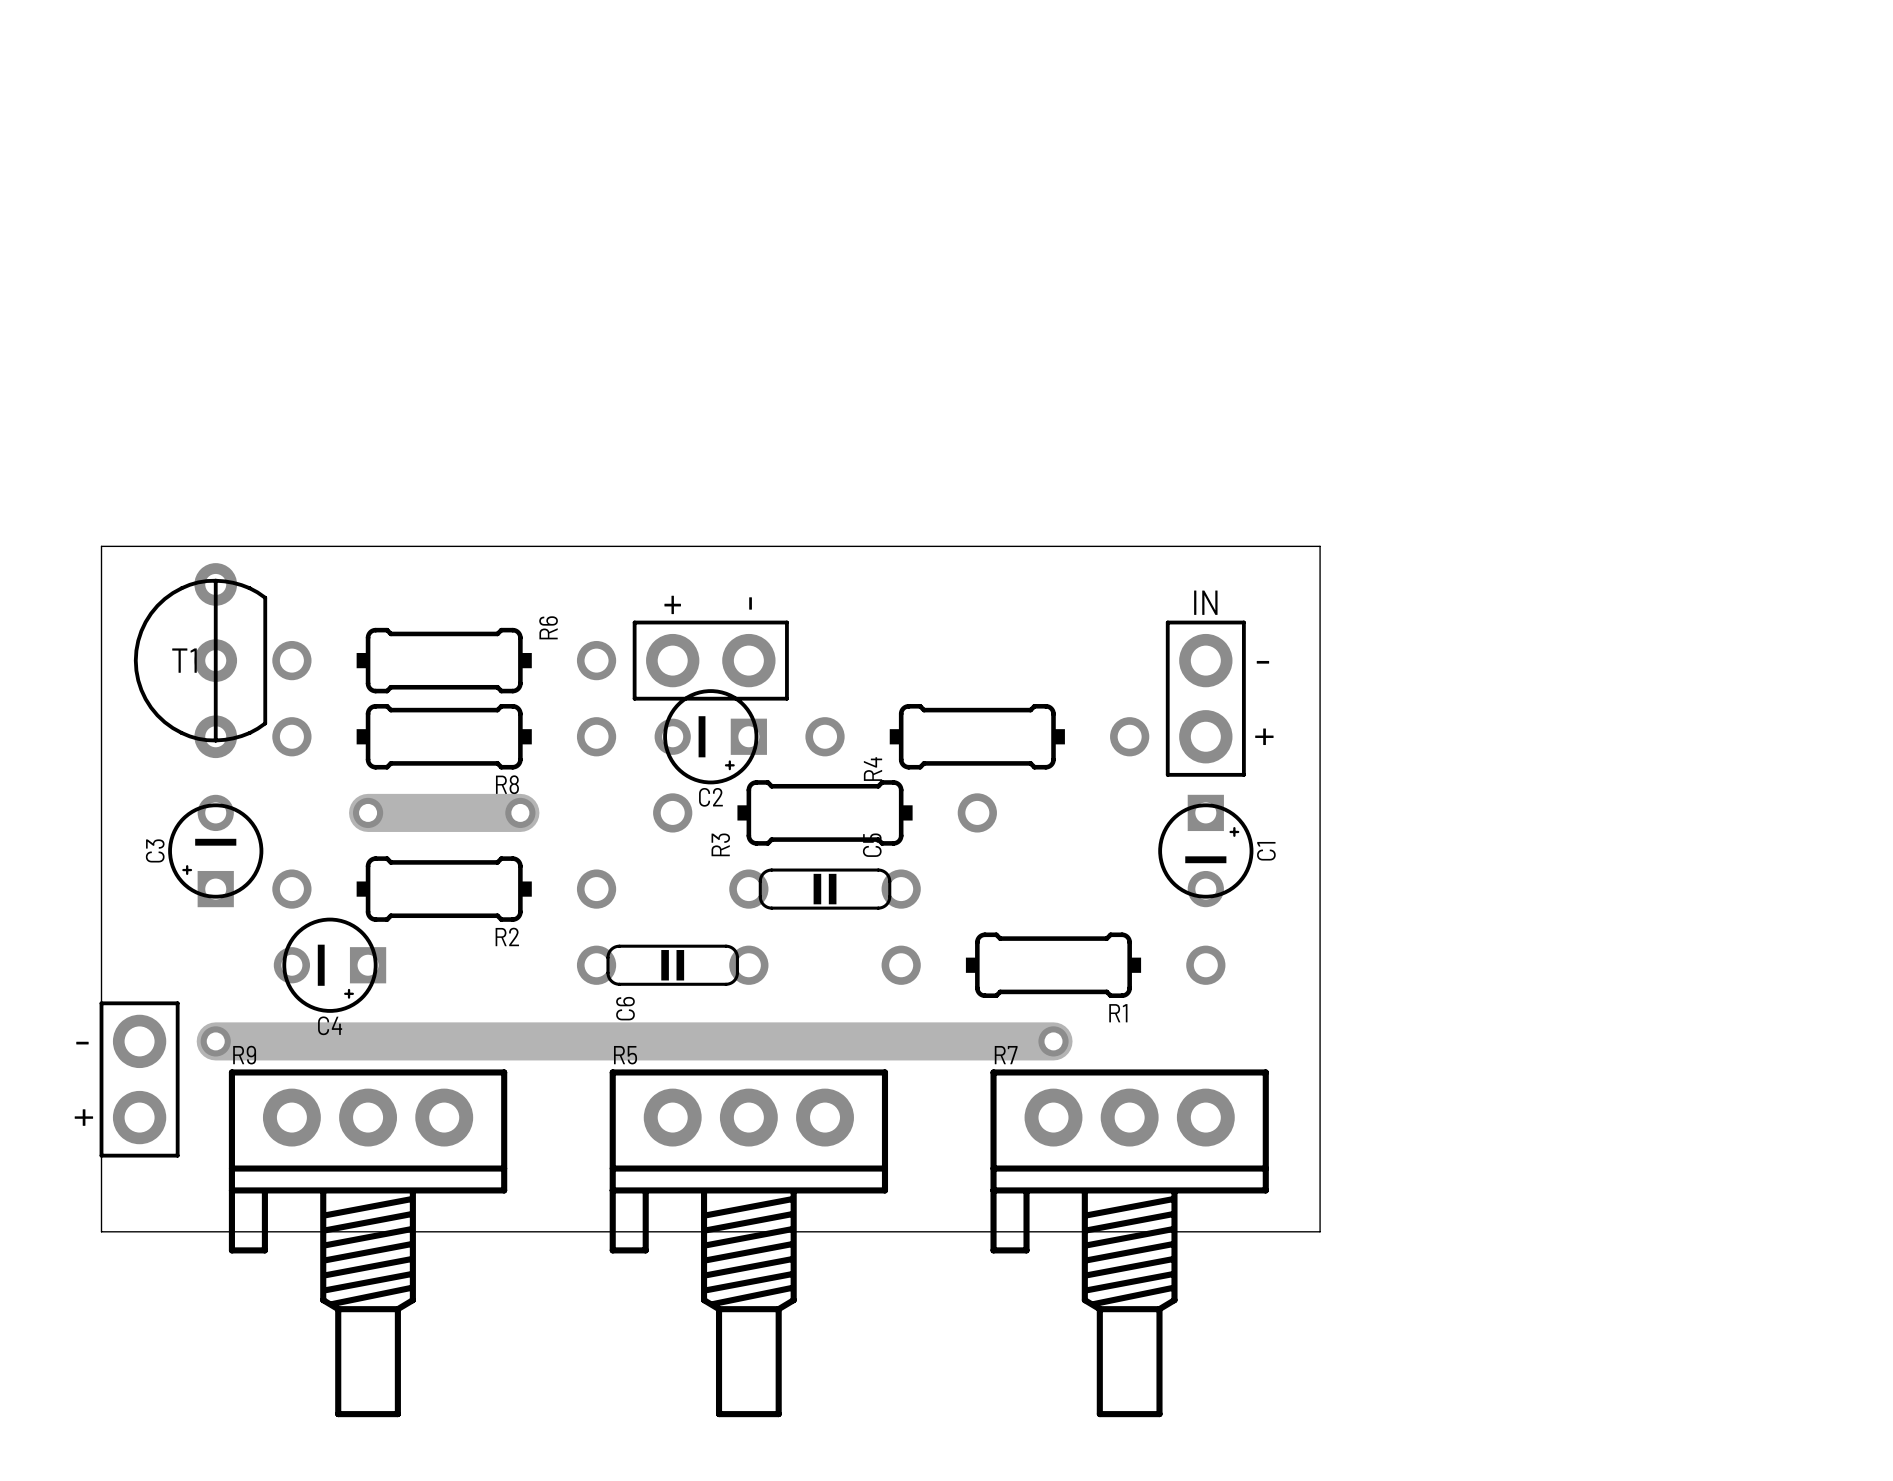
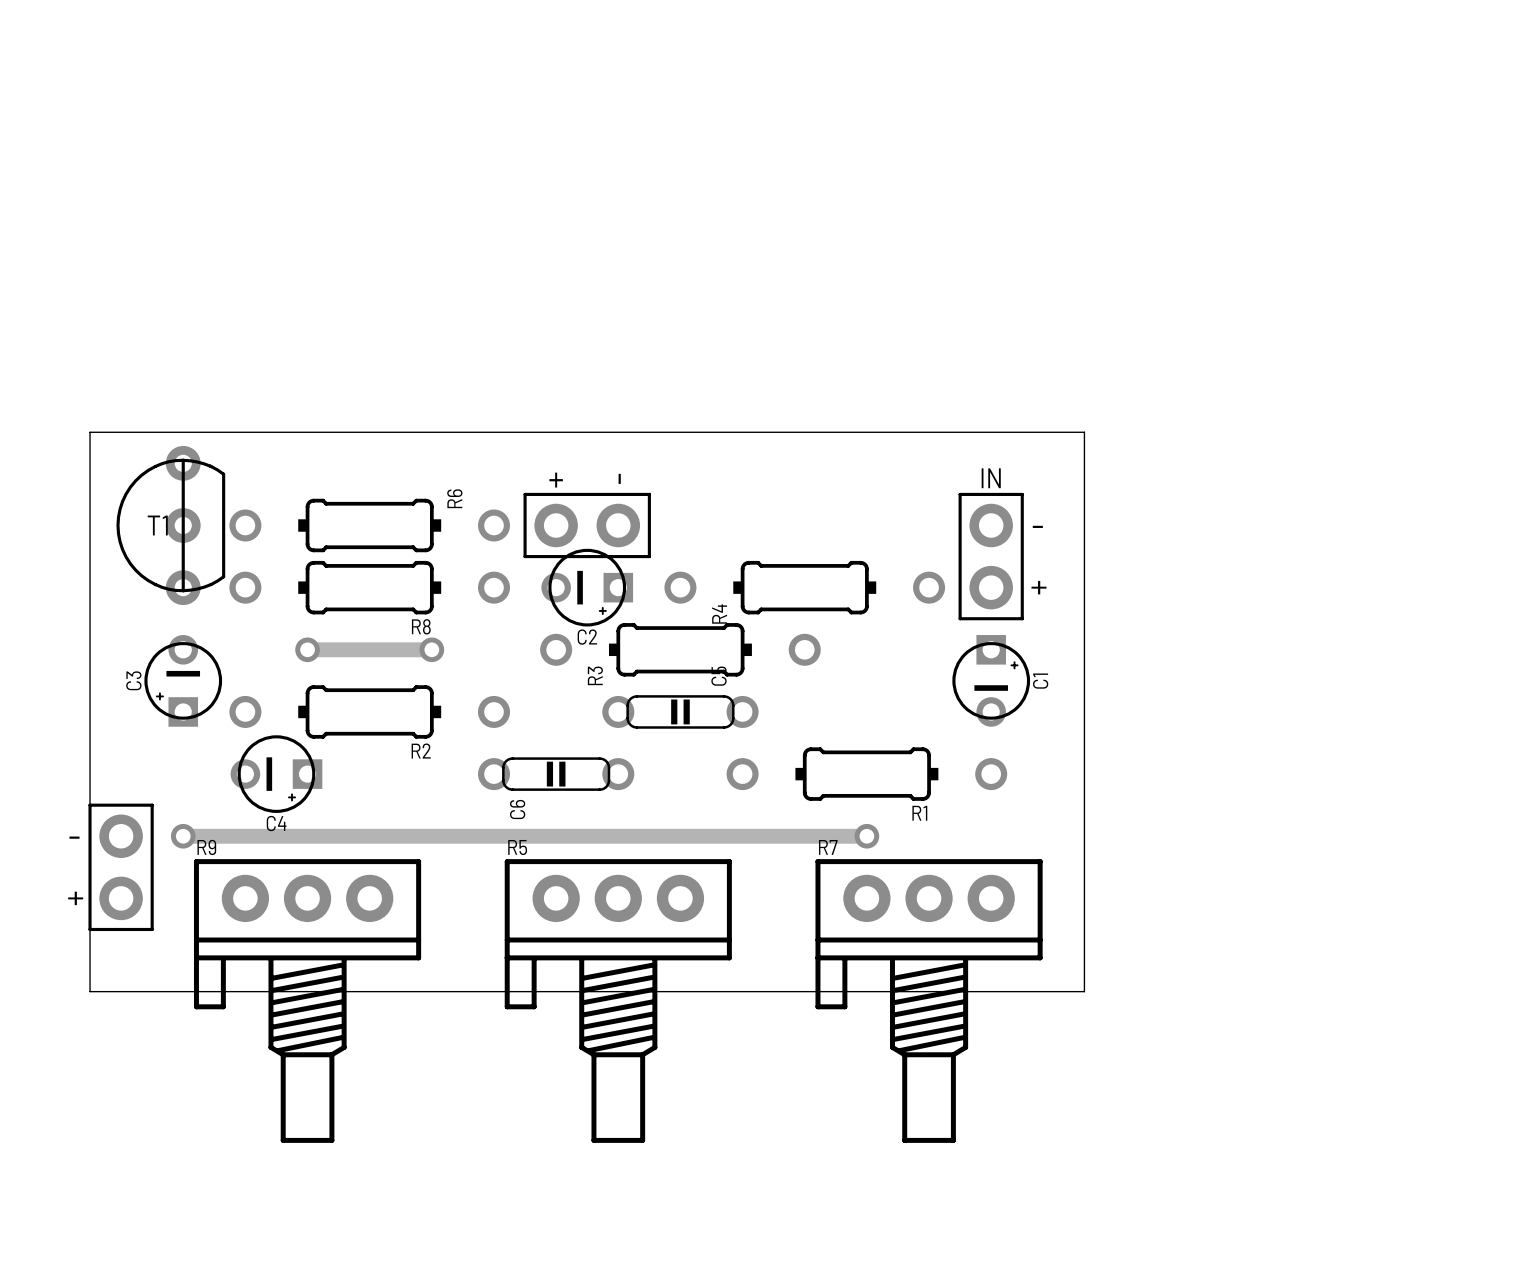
track width: thick (368, 812) (520, 812) -> thin (307, 649) (431, 649)
track width: thick (215, 1041) (1053, 1041) -> thin (183, 836) (866, 836)

